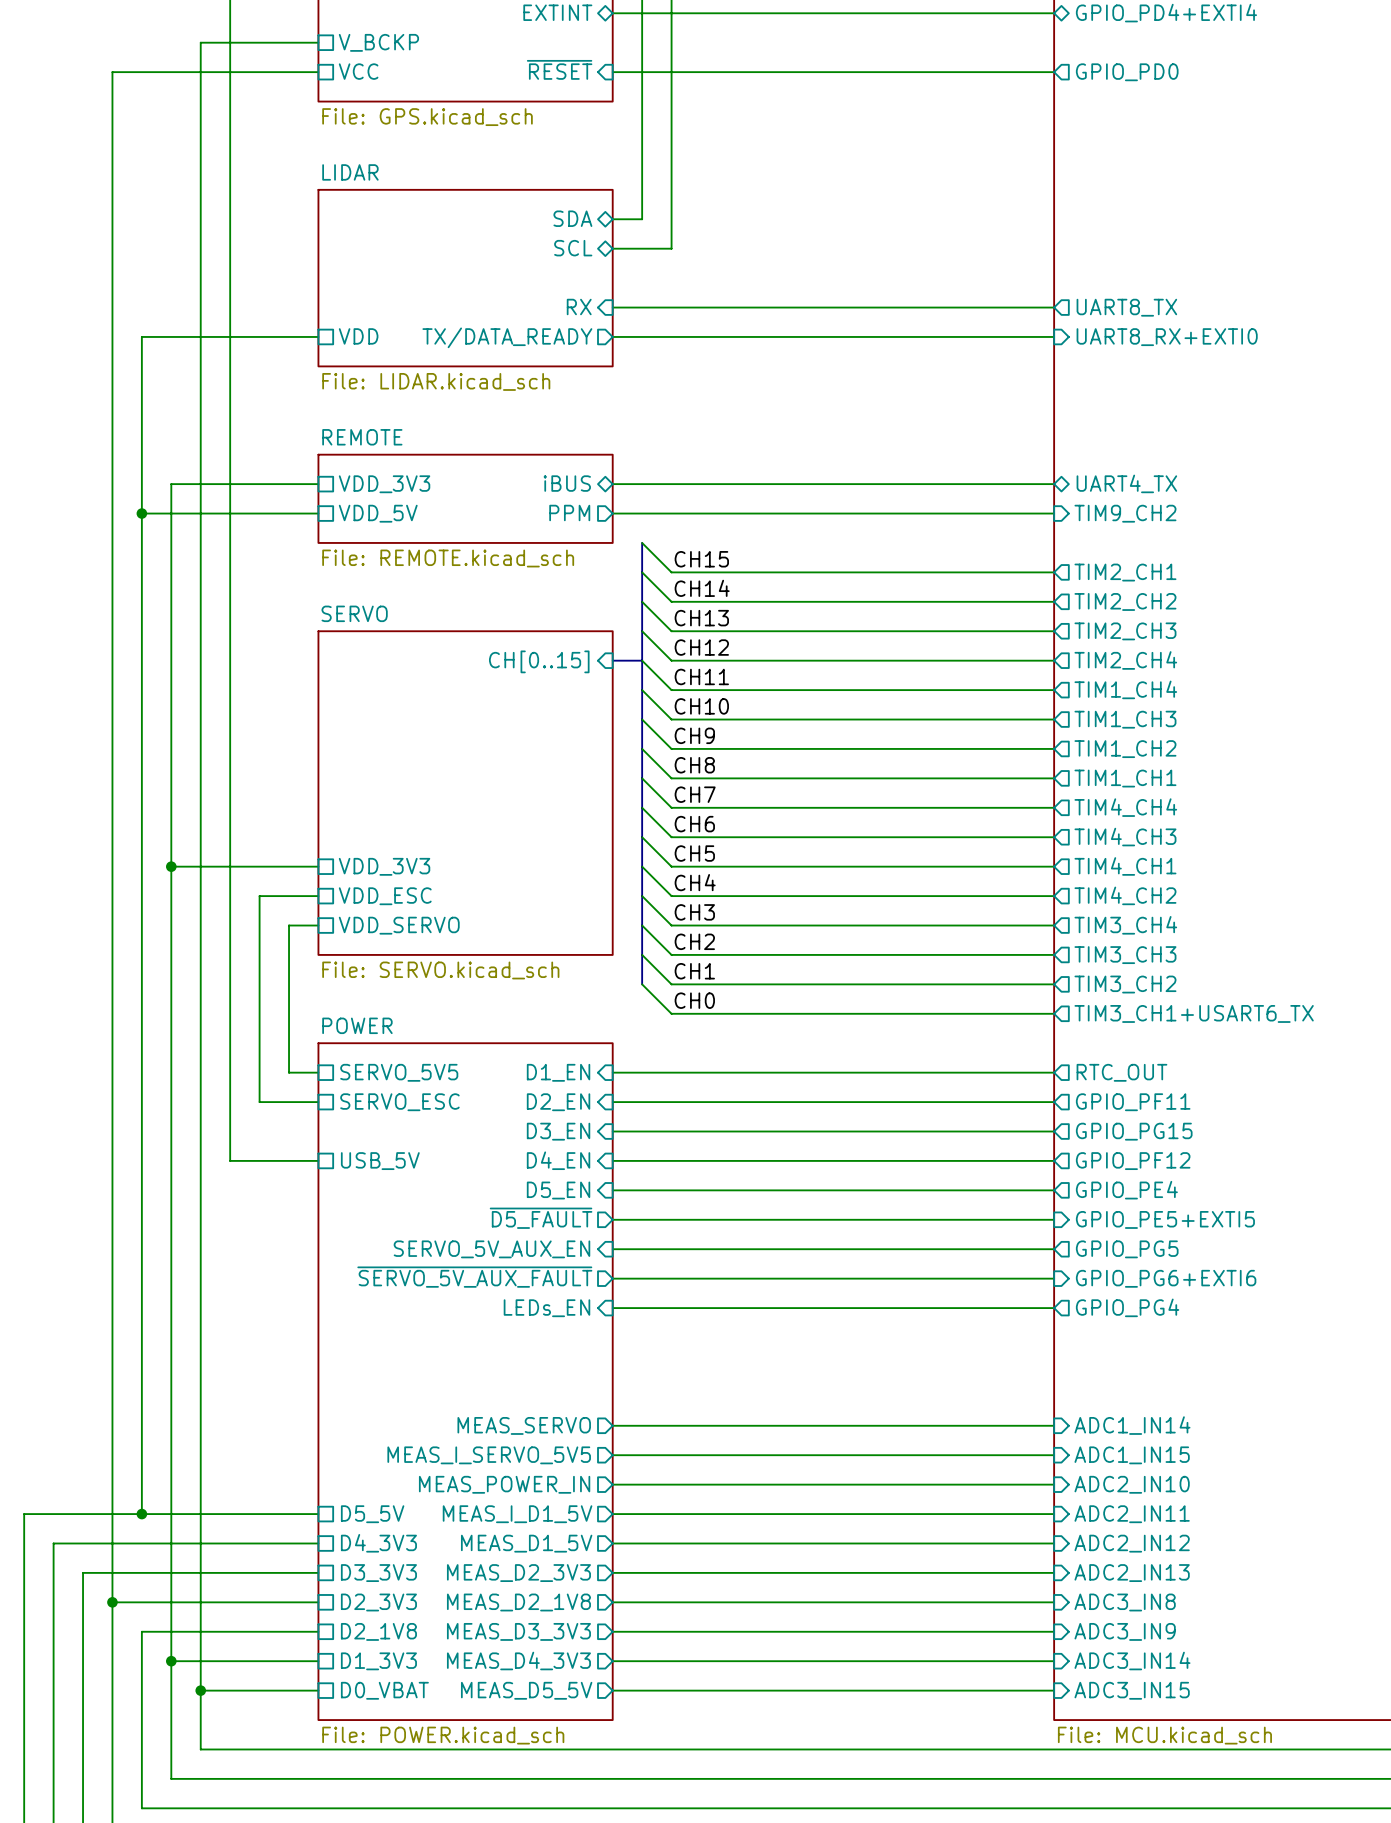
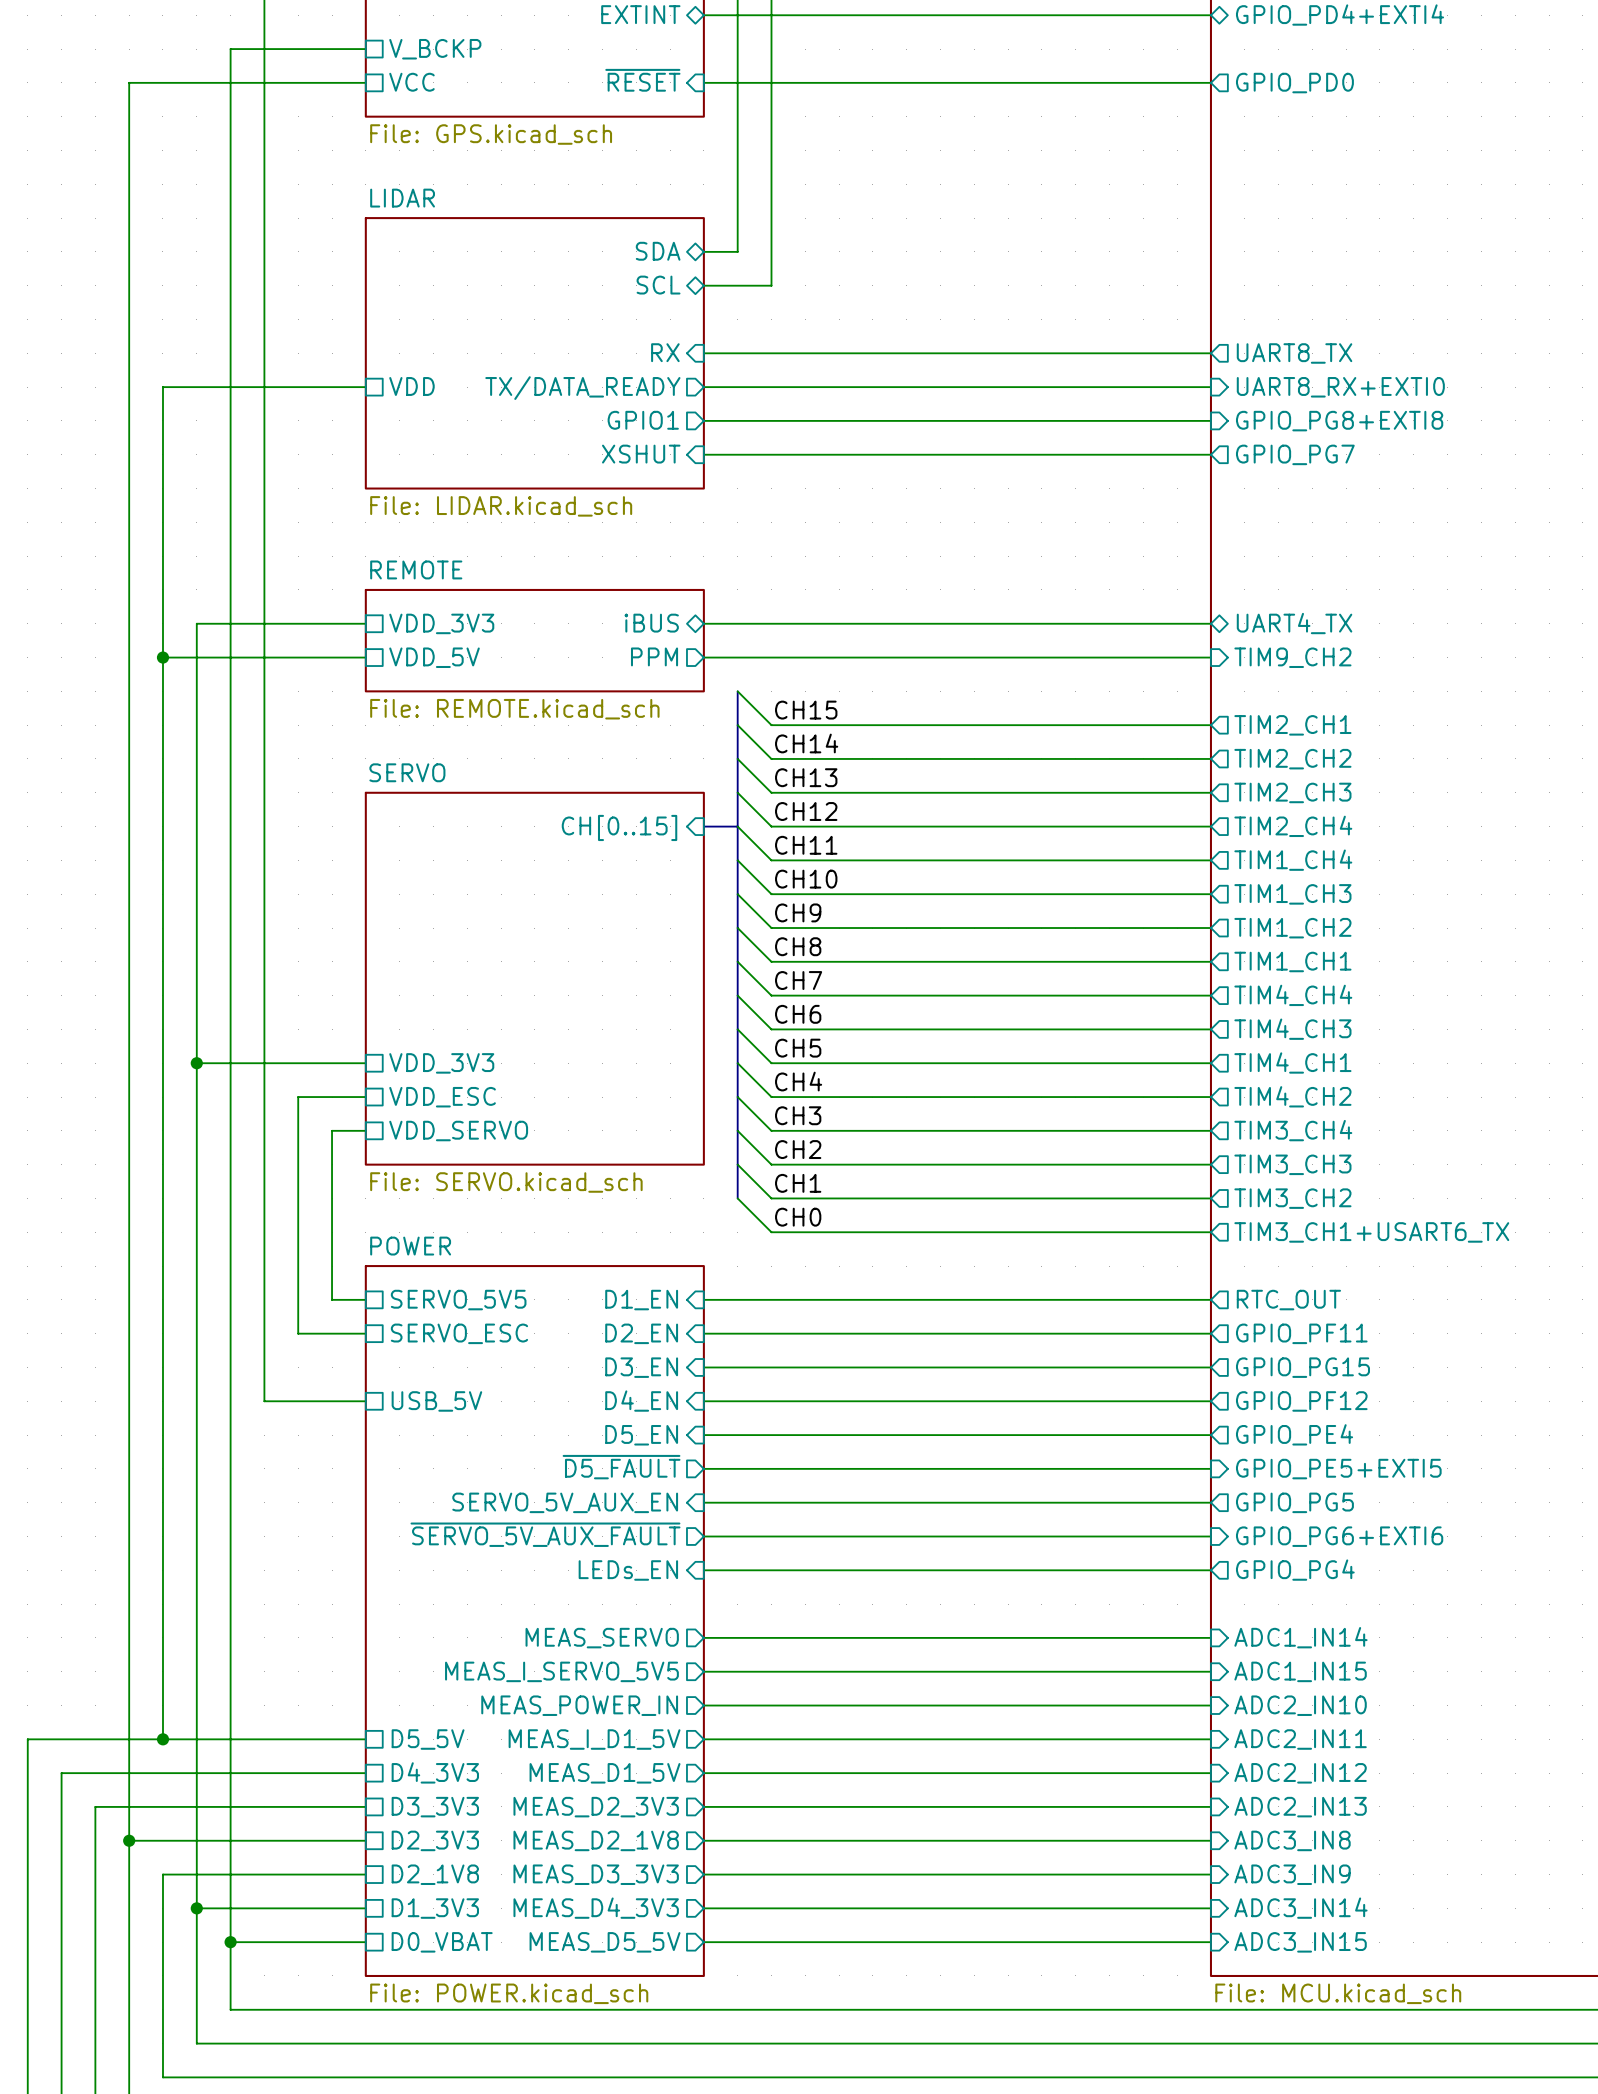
sheet LIDAR: File: LIDAR.kicad_sch (465, 278) -> none
sheet LIDAR: none -> File: LIDAR.kicad_sch (534, 353)
sheet pin: none -> GPIO1 (643, 420)
wire: none -> (703, 420) (1210, 420)
sheet pin: none -> GPIO_PG8+EXTI8 (1339, 421)
sheet pin: none -> XSHUT (641, 454)
sheet pin: none -> GPIO_PG7 (1295, 454)
sheet pin position: iBUS (567, 483) -> iBUS (651, 623)
sheet pin position: UART4_TX (1126, 483) -> UART4_TX (1294, 623)
wire: (318, 484) (171, 484) (171, 542) -> (365, 623) (196, 623)
sheet pin position: VDD_3V3 (384, 484) -> VDD_3V3 (441, 623)
wire: (612, 484) (1054, 484) -> (703, 623) (1210, 623)
sheet REMOTE position: (465, 498) -> (534, 640)
sheet pin position: PPM (569, 512) -> PPM (654, 656)
wire: (141, 513) (318, 513) -> (162, 657) (365, 657)
junction position: (141, 513) -> (162, 657)
sheet pin position: VDD_5V (378, 513) -> VDD_5V (434, 657)
wire: (612, 513) (1054, 513) -> (703, 454) (1210, 454)
sheet pin: TIM9_CH2 (1125, 513) -> none
wire: (642, 542) (671, 572) -> (703, 657) (771, 657)
bus: (642, 542) (642, 601) -> none
label: CH15 (701, 559) -> none
wire: (642, 572) (671, 601) (1054, 601) -> none
sheet pin shape: output (1125, 572) -> input (1292, 657)
sheet pin: TIM2_CH1 (1125, 572) -> TIM9_CH2 (1292, 657)
label: CH14 (702, 588) -> none
sheet pin: TIM2_CH2 (1125, 601) -> none
label: CH13 (701, 618) -> CH15 (806, 710)
sheet pin: TIM2_CH3 (1125, 631) -> TIM2_CH1 (1292, 725)
label: CH12 (701, 647) -> CH14 (806, 743)
bus: (612, 660) (642, 660) -> (703, 826) (737, 826)
sheet pin: TIM2_CH4 (1125, 660) -> TIM2_CH2 (1292, 759)
sheet pin position: CH[0..15] (539, 661) -> CH[0..15] (619, 827)
label: CH11 (701, 676) -> CH13 (806, 777)
sheet pin: TIM1_CH4 (1125, 689) -> TIM2_CH3 (1292, 792)
label: CH10 (701, 706) -> CH12 (806, 811)
sheet pin: TIM1_CH3 (1125, 719) -> TIM2_CH4 (1293, 826)
label: CH9 (694, 735) -> CH11 (806, 845)
sheet pin: TIM1_CH2 (1125, 749) -> TIM1_CH4 (1293, 860)
label: CH8 (694, 765) -> CH10 (806, 879)
sheet pin: TIM1_CH1 (1125, 778) -> TIM1_CH3 (1292, 894)
sheet SERVO position: (465, 793) -> (534, 978)
label: CH7 (695, 794) -> CH9 (798, 912)
sheet pin: TIM4_CH4 (1125, 807) -> TIM1_CH2 (1292, 928)
label: CH6 (694, 824) -> CH8 (798, 946)
sheet pin: TIM4_CH3 (1125, 837) -> TIM1_CH1 (1292, 961)
label: CH5 (694, 853) -> CH7 (798, 980)
wire: (171, 866) (318, 866) -> none
junction position: (171, 866) -> (196, 1063)
sheet pin: VDD_3V3 (384, 866) -> none
sheet pin: TIM4_CH1 (1125, 866) -> TIM4_CH4 (1293, 995)
label: CH4 (695, 882) -> CH6 (798, 1014)
sheet pin: TIM4_CH2 (1125, 895) -> TIM4_CH3 (1292, 1029)
wire: (318, 896) (259, 896) (259, 954) -> (365, 1097) (298, 1097)
sheet pin position: VDD_ESC (385, 896) -> VDD_ESC (442, 1097)
label: CH3 (694, 912) -> CH5 (798, 1048)
wire: none -> (196, 1063) (332, 1063)
wire: (289, 925) (289, 984) -> (365, 1130) (332, 1130)
sheet pin: VDD_SERVO (399, 925) -> VDD_3V3 (441, 1063)
sheet pin: TIM3_CH4 (1125, 925) -> TIM4_CH1 (1292, 1062)
label: CH2 (694, 941) -> CH4 (798, 1081)
sheet pin: TIM3_CH3 (1125, 955) -> TIM4_CH2 (1292, 1096)
label: CH1 (694, 971) -> CH3 (798, 1115)
sheet pin: none -> VDD_SERVO (458, 1131)
bus: none -> (737, 1130) (737, 1198)
sheet pin: TIM3_CH2 (1125, 984) -> TIM3_CH4 (1293, 1130)
label: CH0 (694, 1000) -> CH2 (798, 1149)
wire: none -> (737, 1164) (771, 1198) (1210, 1198)
sheet pin: TIM3_CH1+USART6_TX (1194, 1013) -> TIM3_CH3 (1292, 1164)
label: none -> CH1 (798, 1183)
sheet pin: none -> TIM3_CH2 (1292, 1198)
label: none -> CH0 (798, 1217)
wire: (289, 1072) (318, 1072) -> (332, 1232) (332, 1299) (365, 1299)
sheet pin position: SERVO_5V5 (399, 1072) -> SERVO_5V5 (458, 1300)
sheet pin: D1_EN (558, 1072) -> none
wire: (612, 1072) (671, 1072) -> (737, 1198) (771, 1232)
sheet pin: RTC_OUT (1121, 1072) -> TIM3_CH1+USART6_TX (1371, 1232)
wire: (259, 1102) (318, 1102) -> none
sheet pin: SERVO_ESC (399, 1102) -> none
sheet pin: D2_EN (558, 1102) -> none
wire: (612, 1102) (1054, 1102) -> (703, 1536) (1210, 1536)
sheet pin: GPIO_PF11 (1133, 1102) -> none
sheet pin: D3_EN (558, 1131) -> D1_EN (641, 1300)
sheet pin: GPIO_PG15 (1134, 1131) -> RTC_OUT (1288, 1300)
wire: (230, 1160) (259, 1160) -> (298, 1266) (298, 1333)
wire: none -> (264, 1333) (264, 1401) (365, 1401)
sheet pin: D4_EN (558, 1160) -> D2_EN (641, 1333)
sheet pin: USB_5V (380, 1161) -> SERVO_ESC (459, 1333)
sheet pin: GPIO_PF12 (1133, 1161) -> GPIO_PF11 (1301, 1333)
sheet pin: D5_EN (558, 1190) -> D3_EN (641, 1367)
sheet pin: GPIO_PE4 (1126, 1190) -> GPIO_PG15 (1302, 1367)
sheet pin shape: output (541, 1218) -> input (641, 1401)
sheet pin: ~{D5_FAULT} (541, 1218) -> D4_EN (641, 1401)
sheet pin: none -> USB_5V (436, 1401)
sheet pin shape: input (1165, 1219) -> output (1301, 1401)
sheet pin: GPIO_PE5+EXTI5 (1165, 1219) -> GPIO_PF12 (1301, 1401)
sheet pin: SERVO_5V_AUX_EN (491, 1249) -> D5_EN (641, 1435)
sheet pin: GPIO_PG5 (1127, 1249) -> GPIO_PE4 (1294, 1434)
sheet pin: ~{SERVO_5V_AUX_FAULT} (474, 1277) -> ~{D5_FAULT} (621, 1467)
sheet pin: GPIO_PG6+EXTI6 (1166, 1278) -> GPIO_PE5+EXTI5 (1338, 1469)
sheet pin: GPIO_PG4 (1127, 1307) -> GPIO_PG5 (1294, 1502)
sheet pin: LEDs_EN (546, 1308) -> SERVO_5V_AUX_EN (565, 1502)
sheet pin: none -> ~{SERVO_5V_AUX_FAULT} (545, 1534)
sheet pin: none -> GPIO_PG6+EXTI6 (1339, 1536)
wire: none -> (703, 1570) (1210, 1570)
sheet pin: none -> GPIO_PG4 (1295, 1570)
sheet pin: none -> LEDs_EN (628, 1570)
sheet POWER: File: POWER.kicad_sch (465, 1381) -> none
sheet POWER: none -> File: POWER.kicad_sch (534, 1621)

